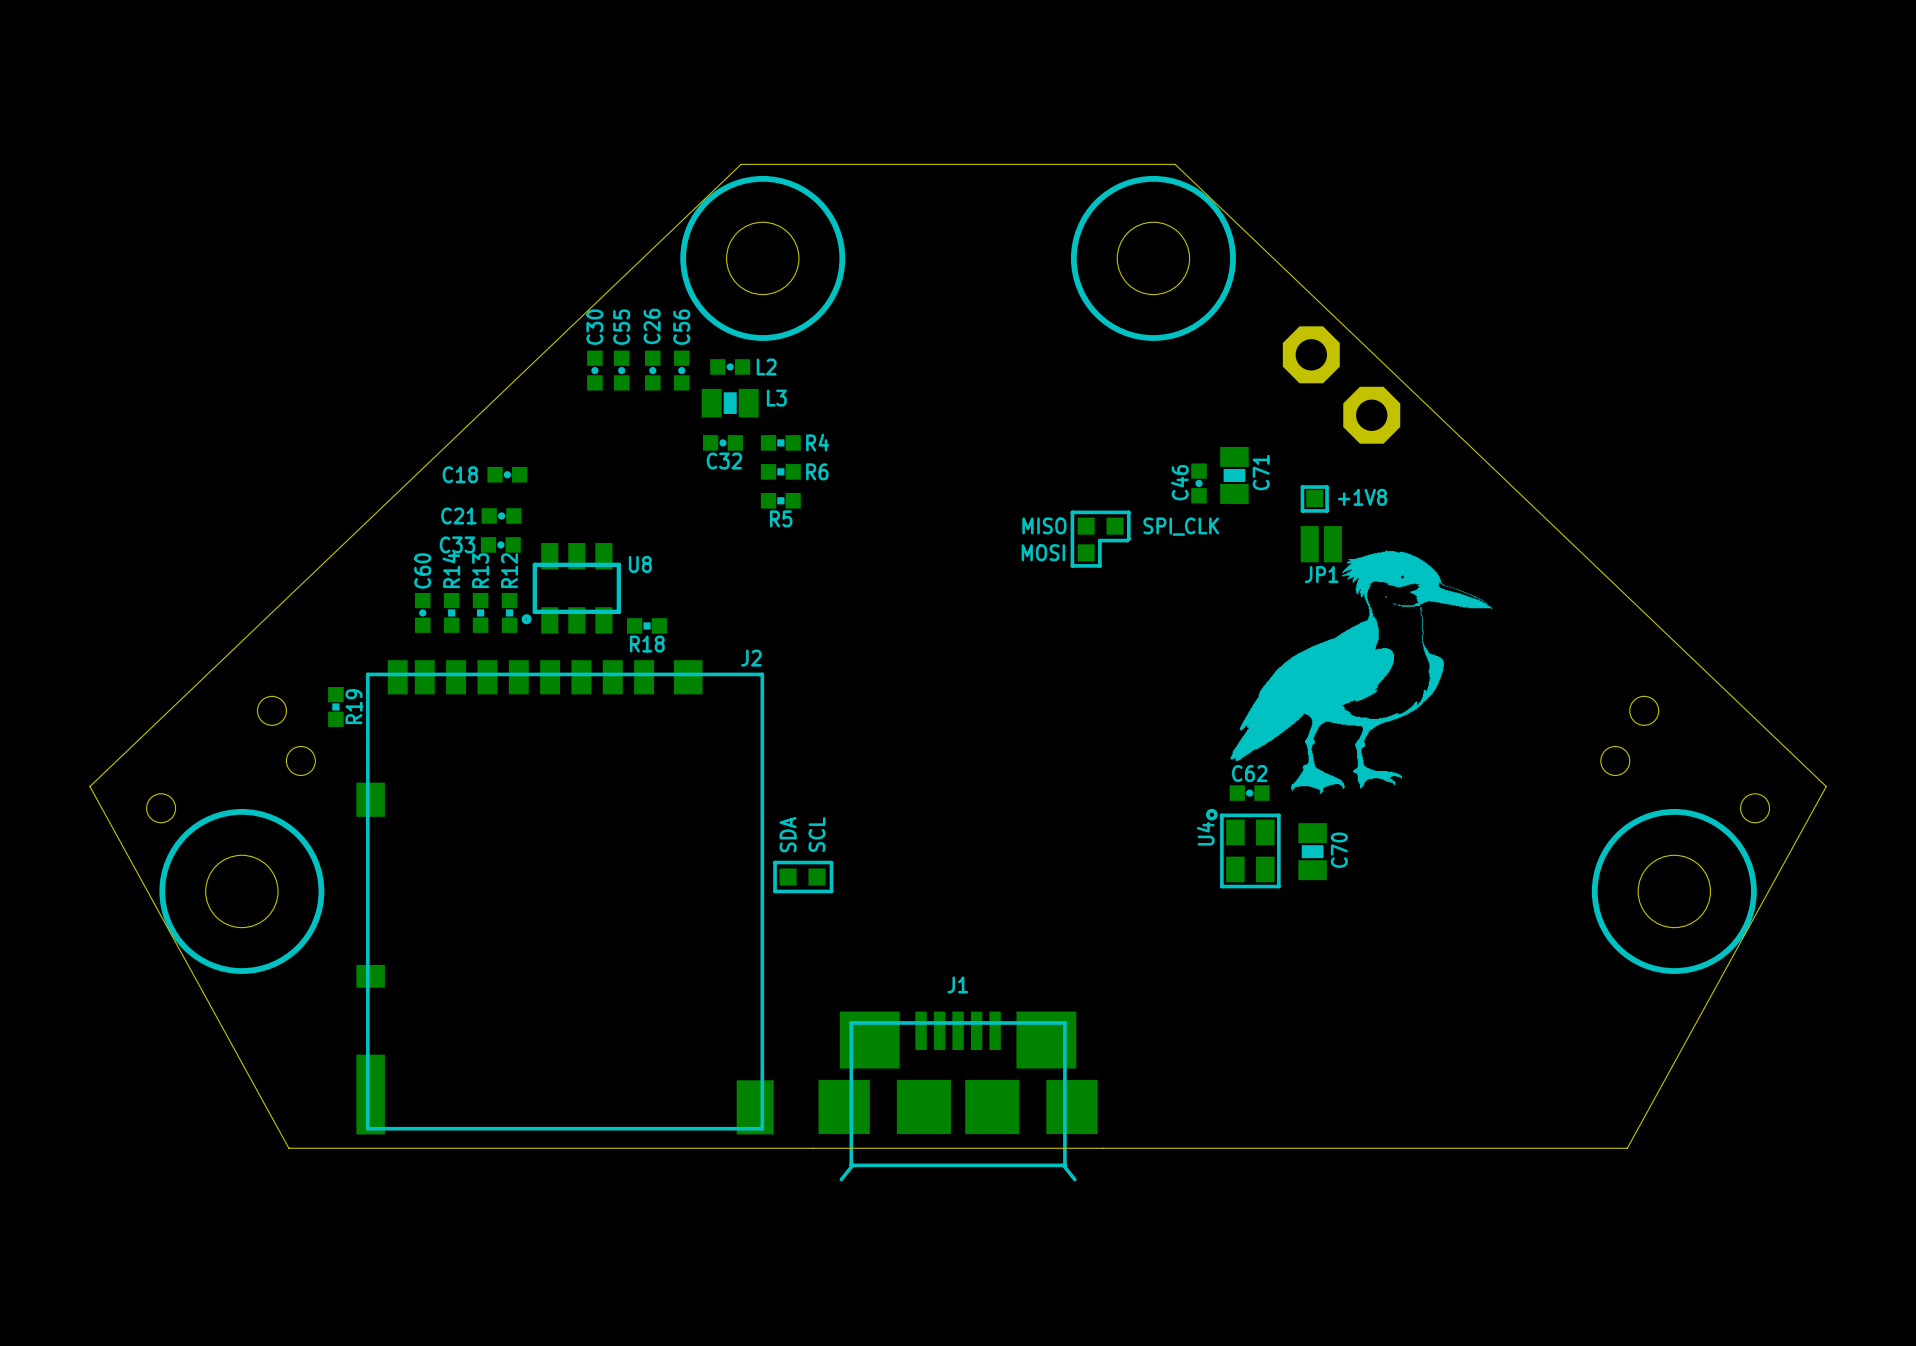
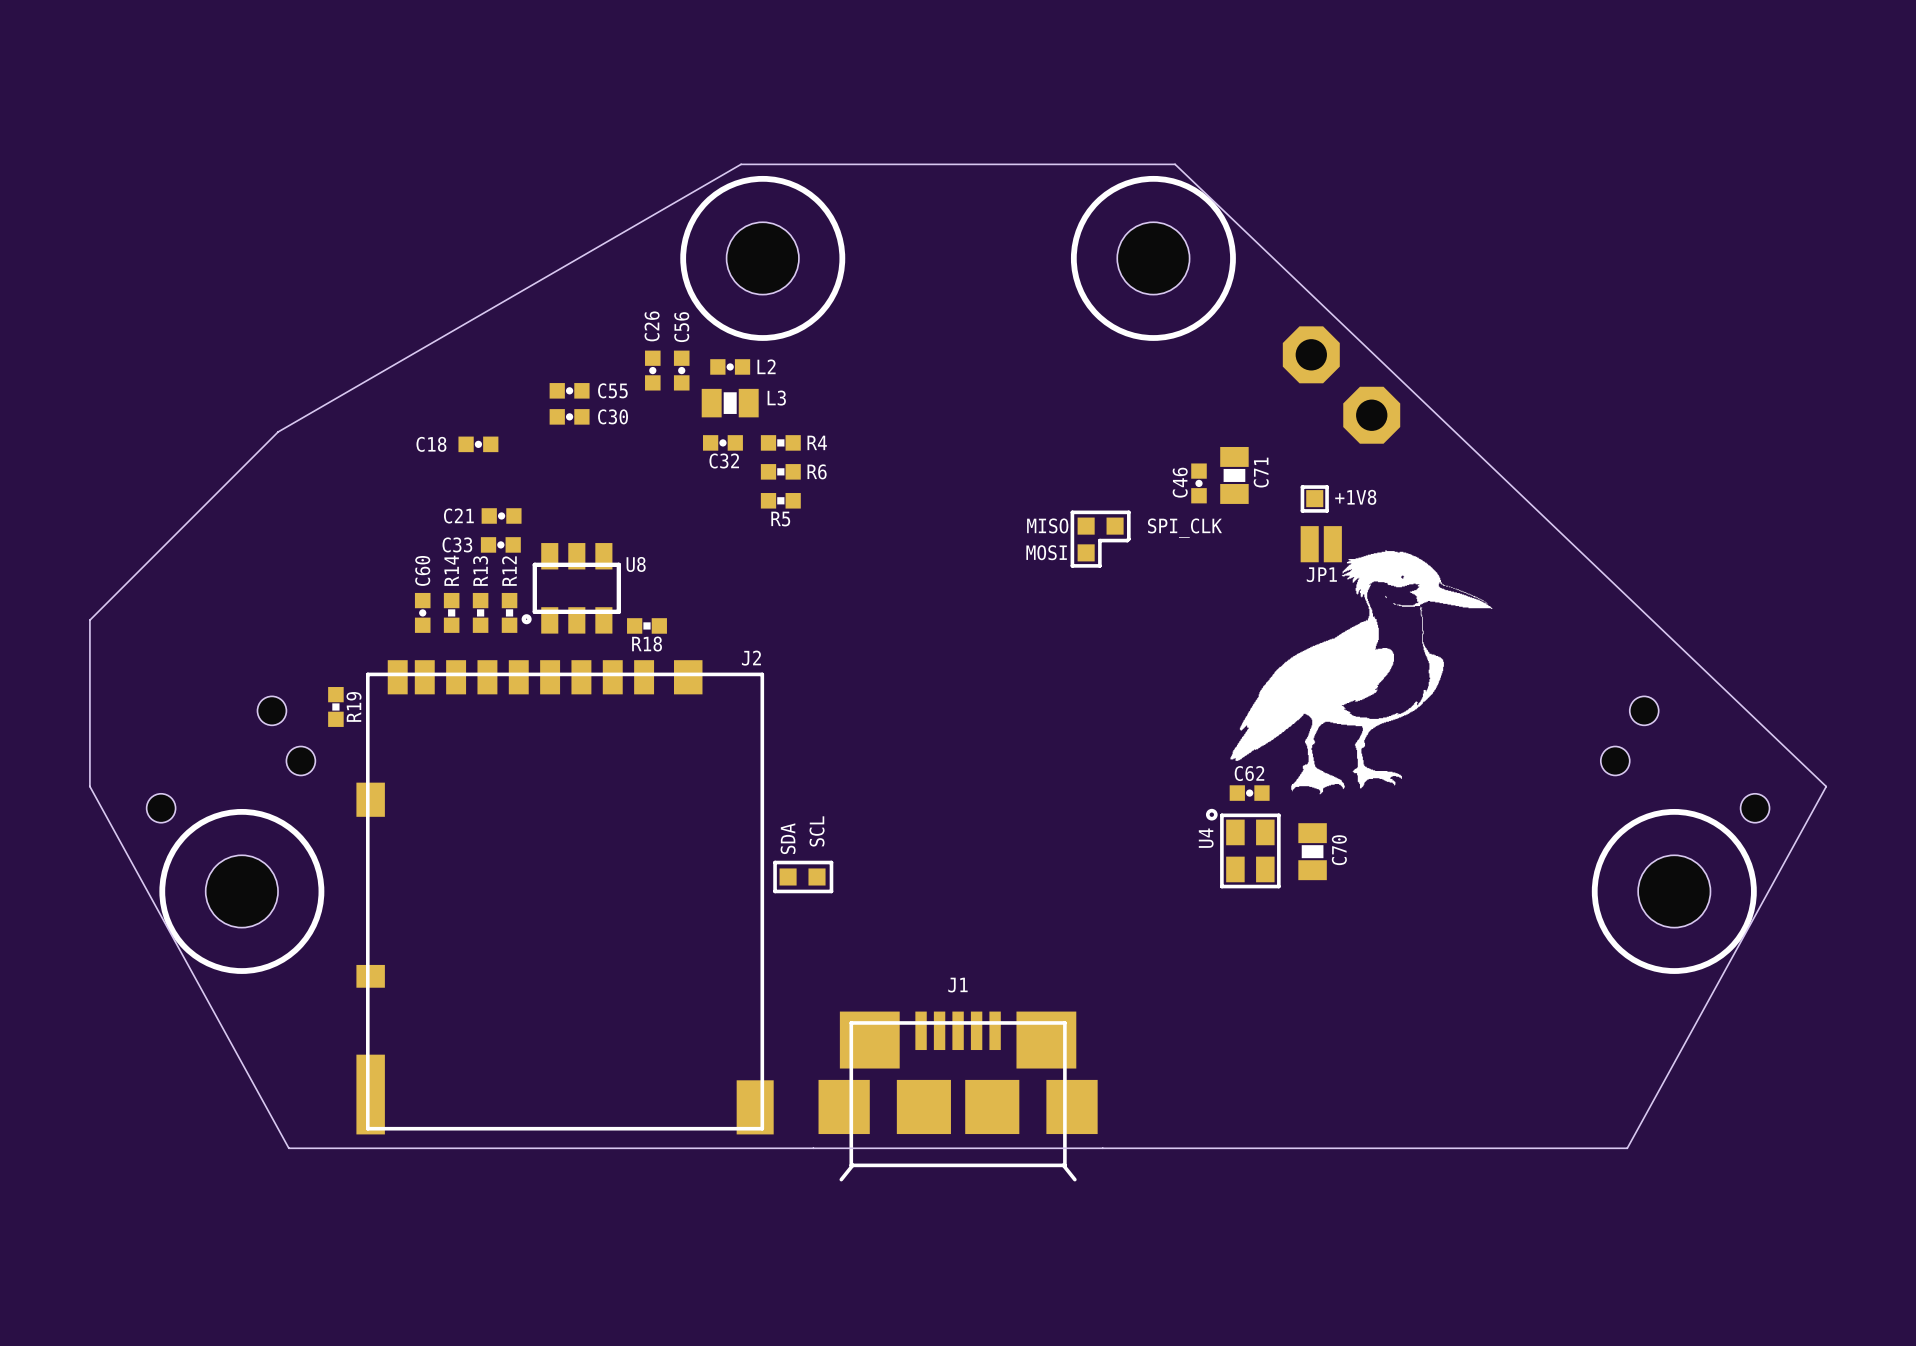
board edge: (741, 164) (89, 786) -> (741, 164) (278, 432) (89, 620) (89, 786)
C30 rotation: 0° (594, 370) -> 90° clockwise (569, 416)
C30 position: (594, 370) -> (569, 416)
C55 rotation: 0° (621, 370) -> 90° clockwise (569, 390)
C55 position: (621, 370) -> (569, 390)
C18 position: (507, 474) -> (478, 444)

